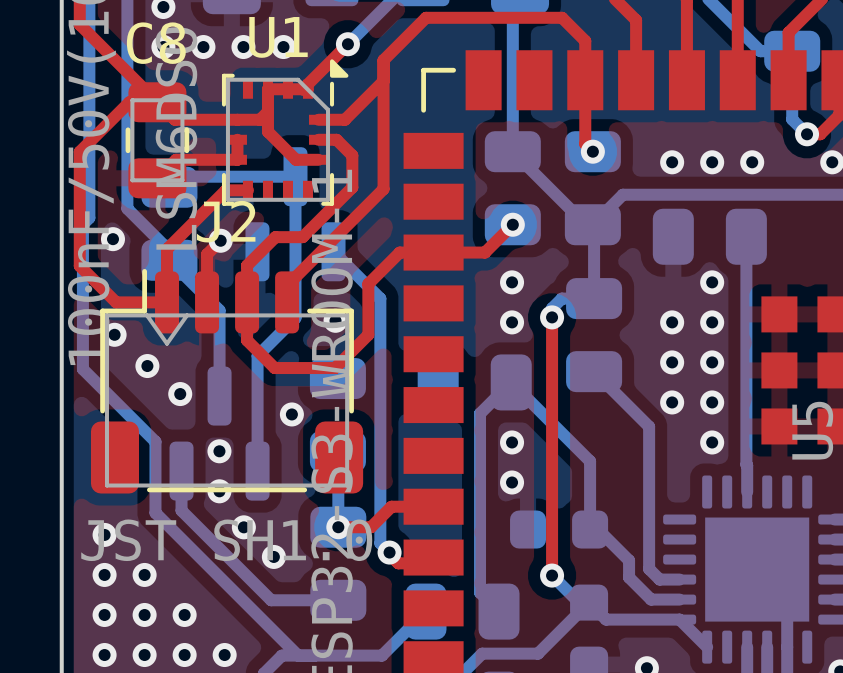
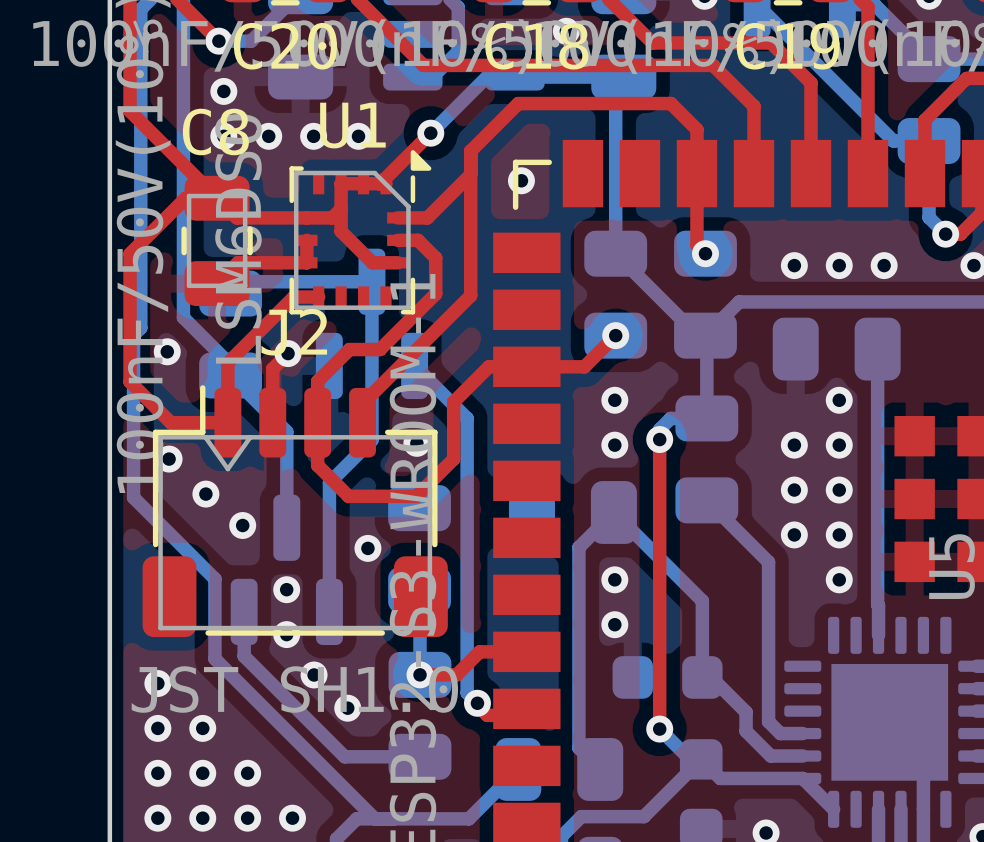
via: none -> (521, 180)

